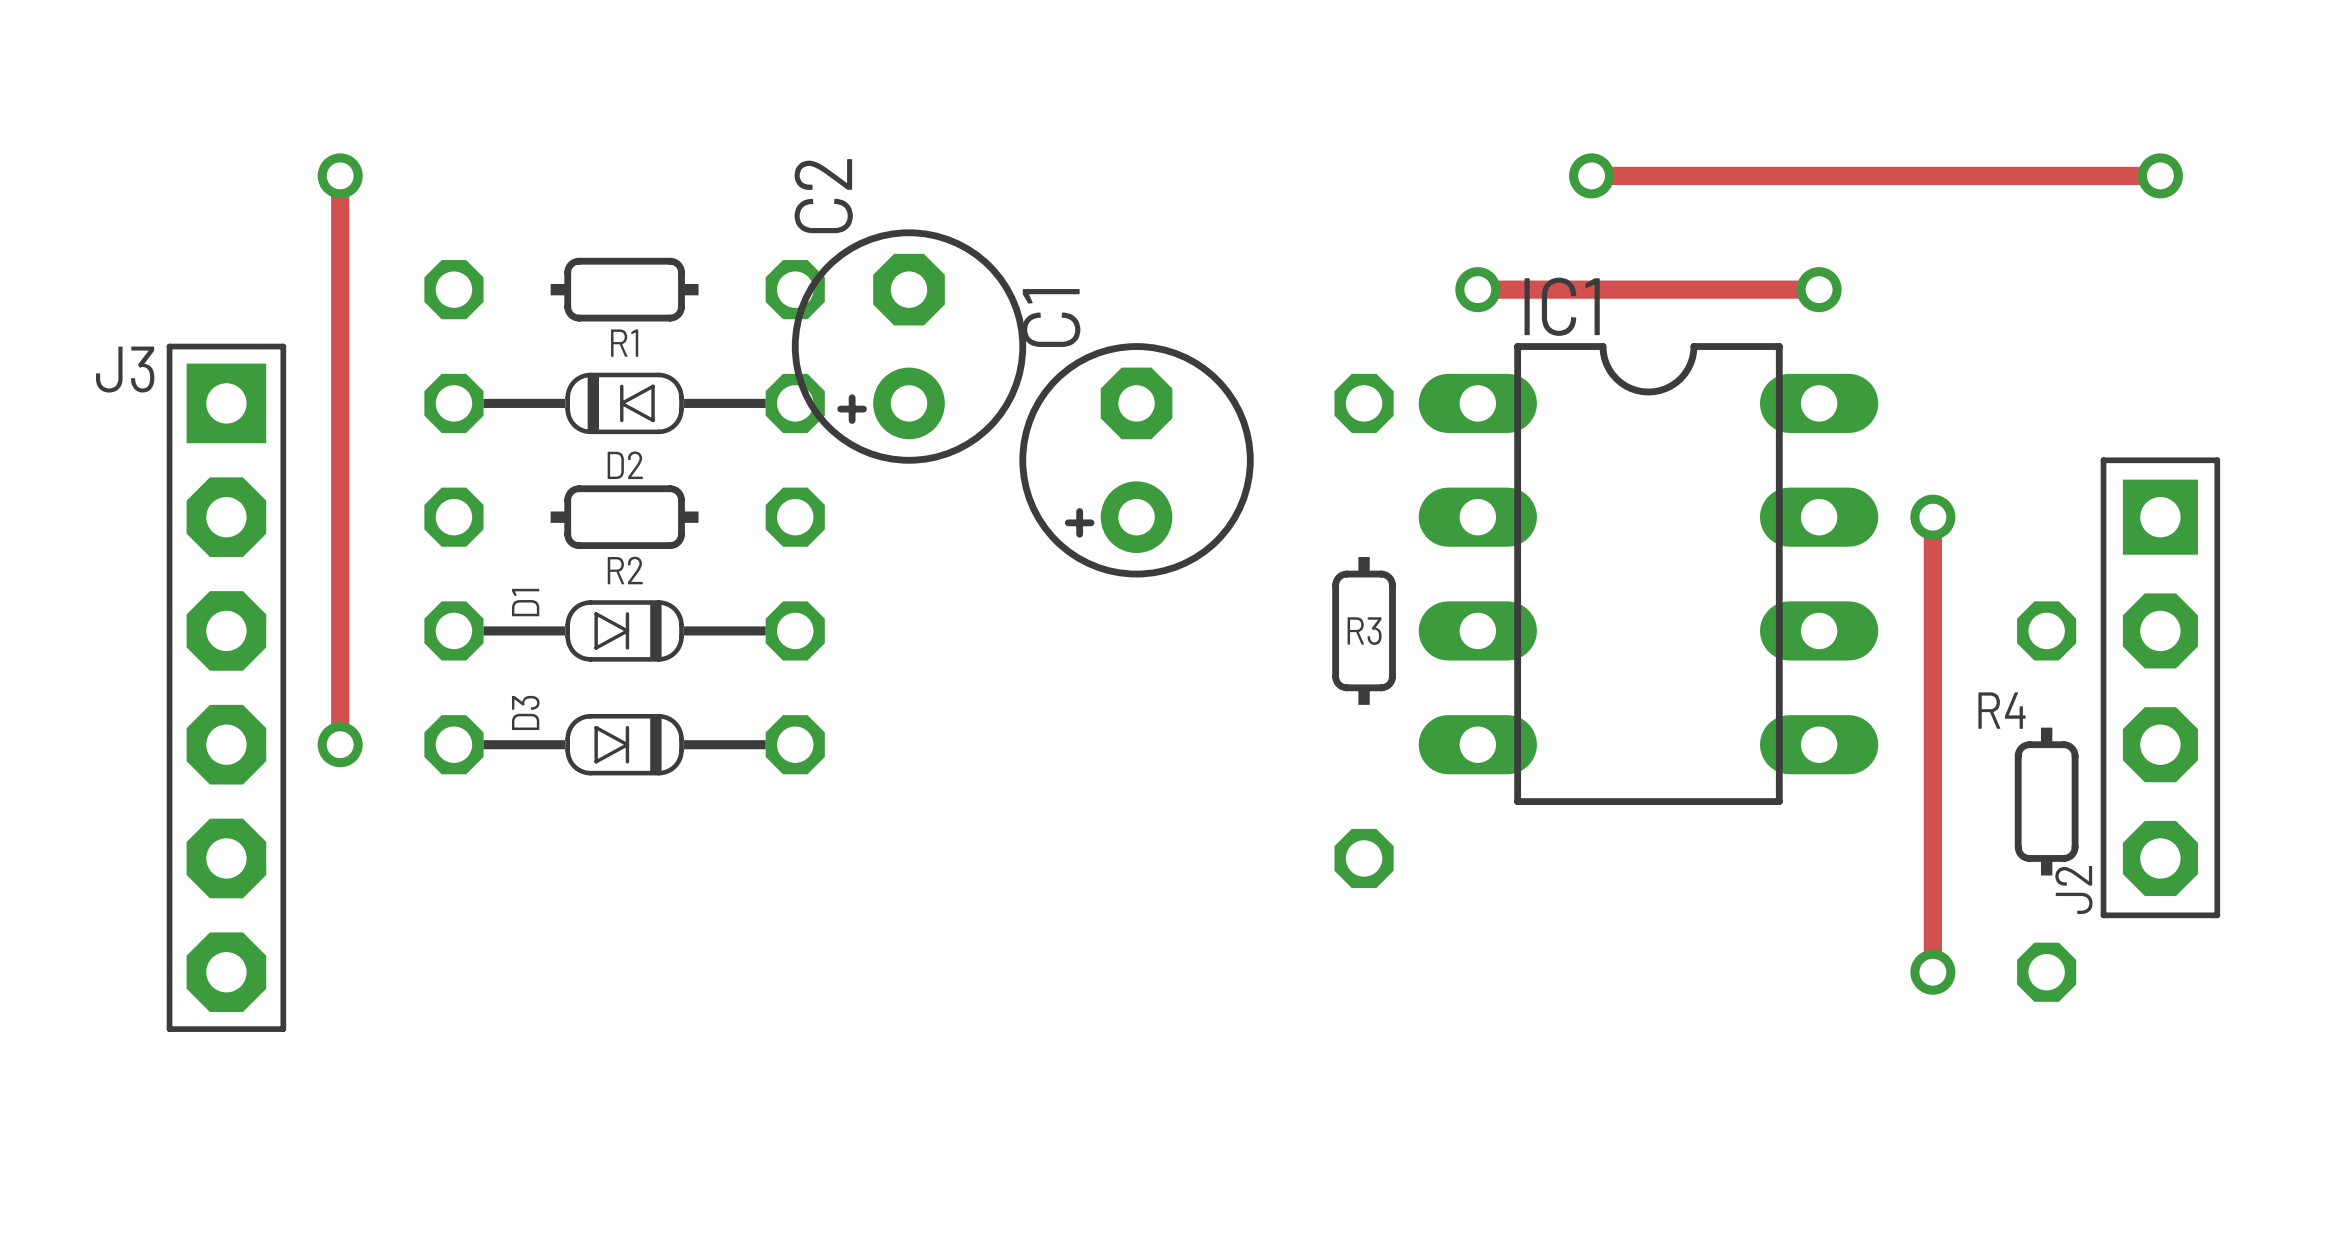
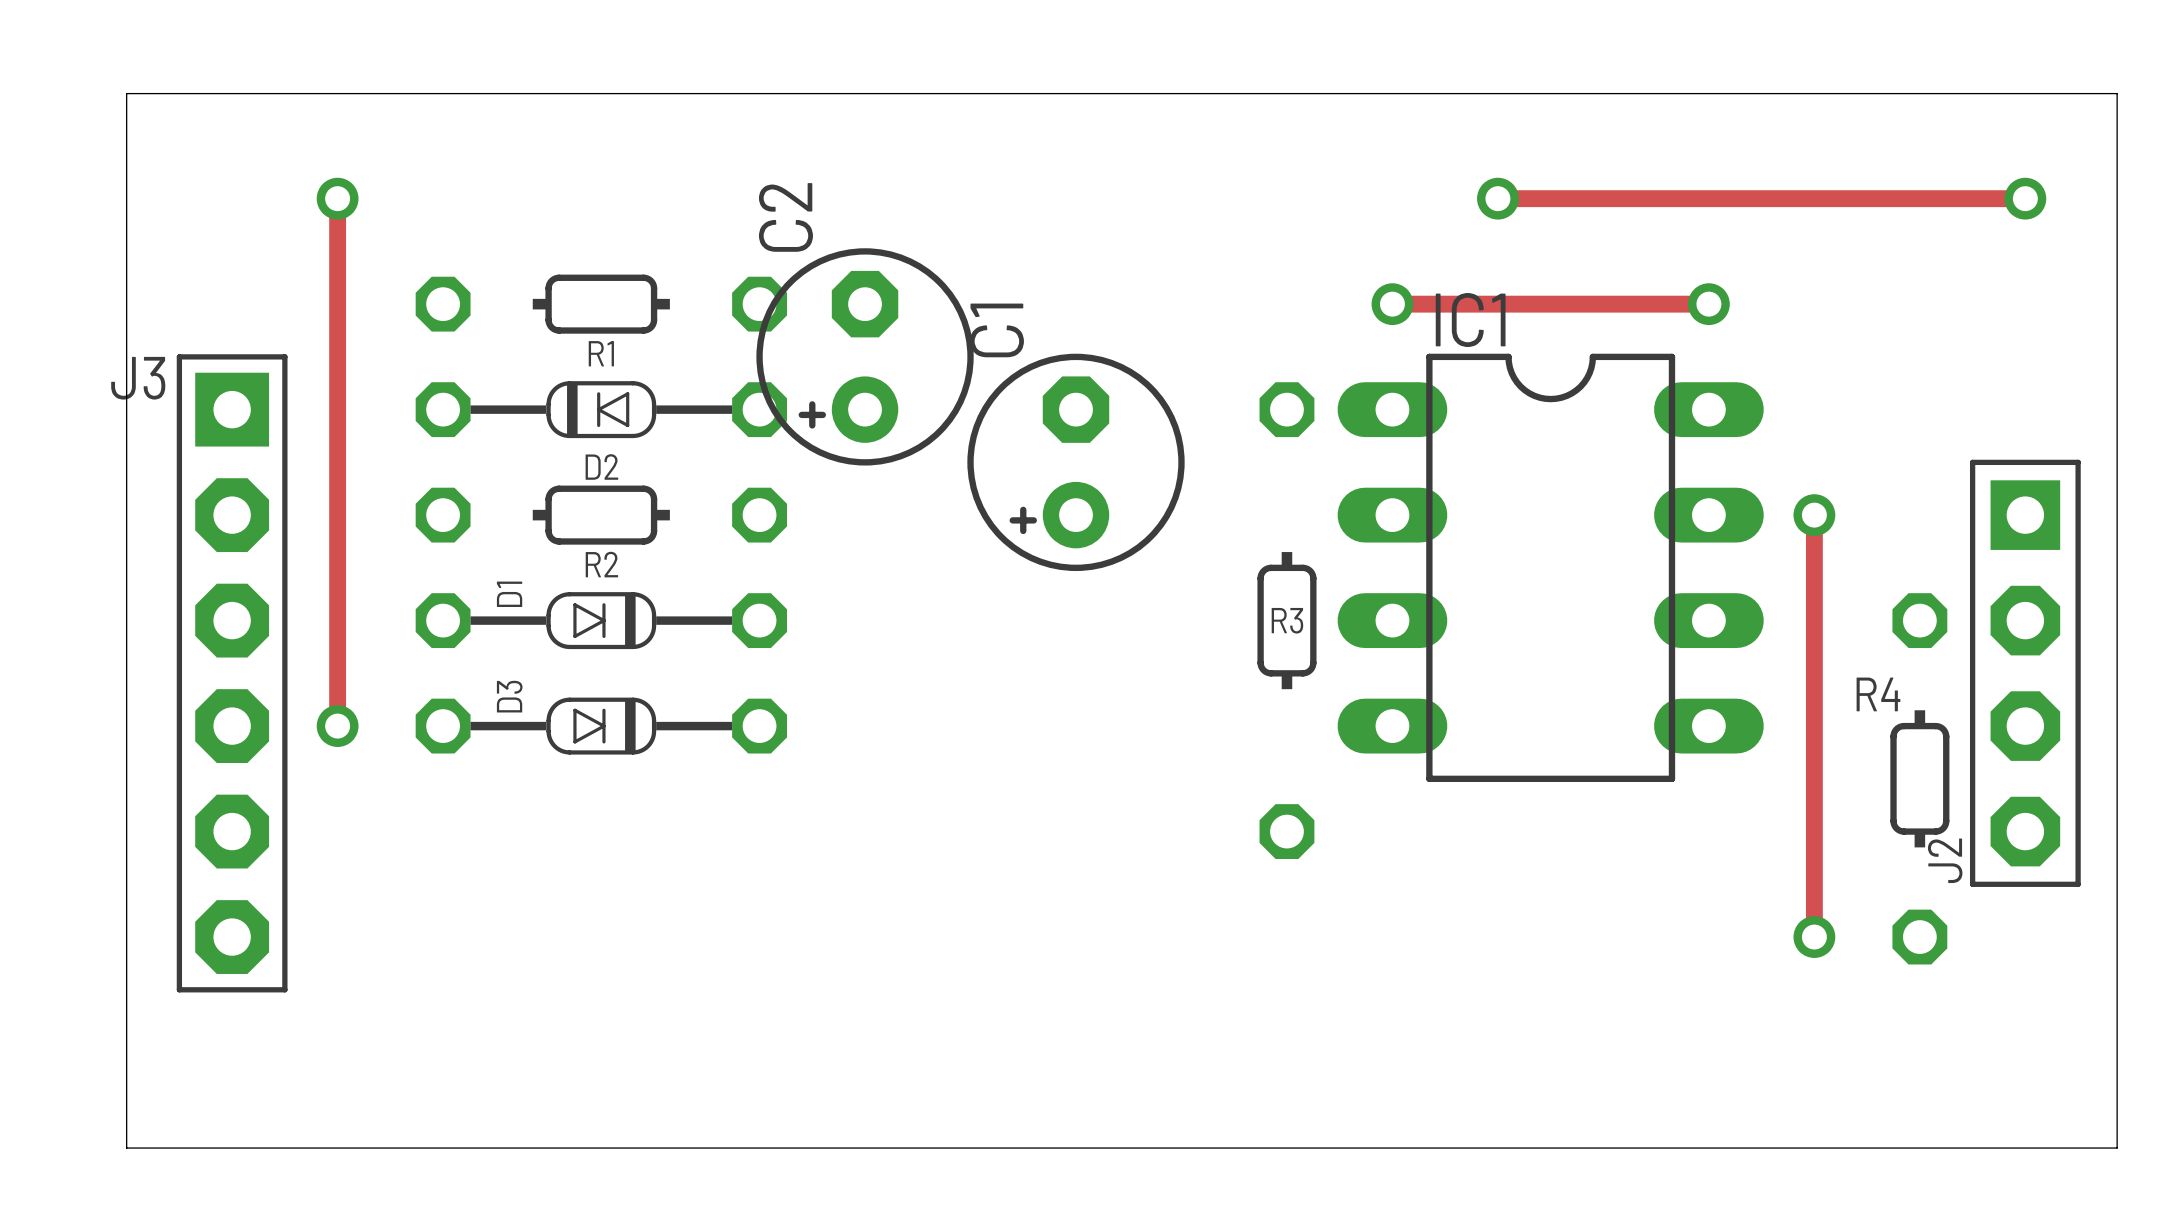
board edge: none -> (126, 93) (2117, 93) (2117, 1148) (126, 1148) (126, 93)

